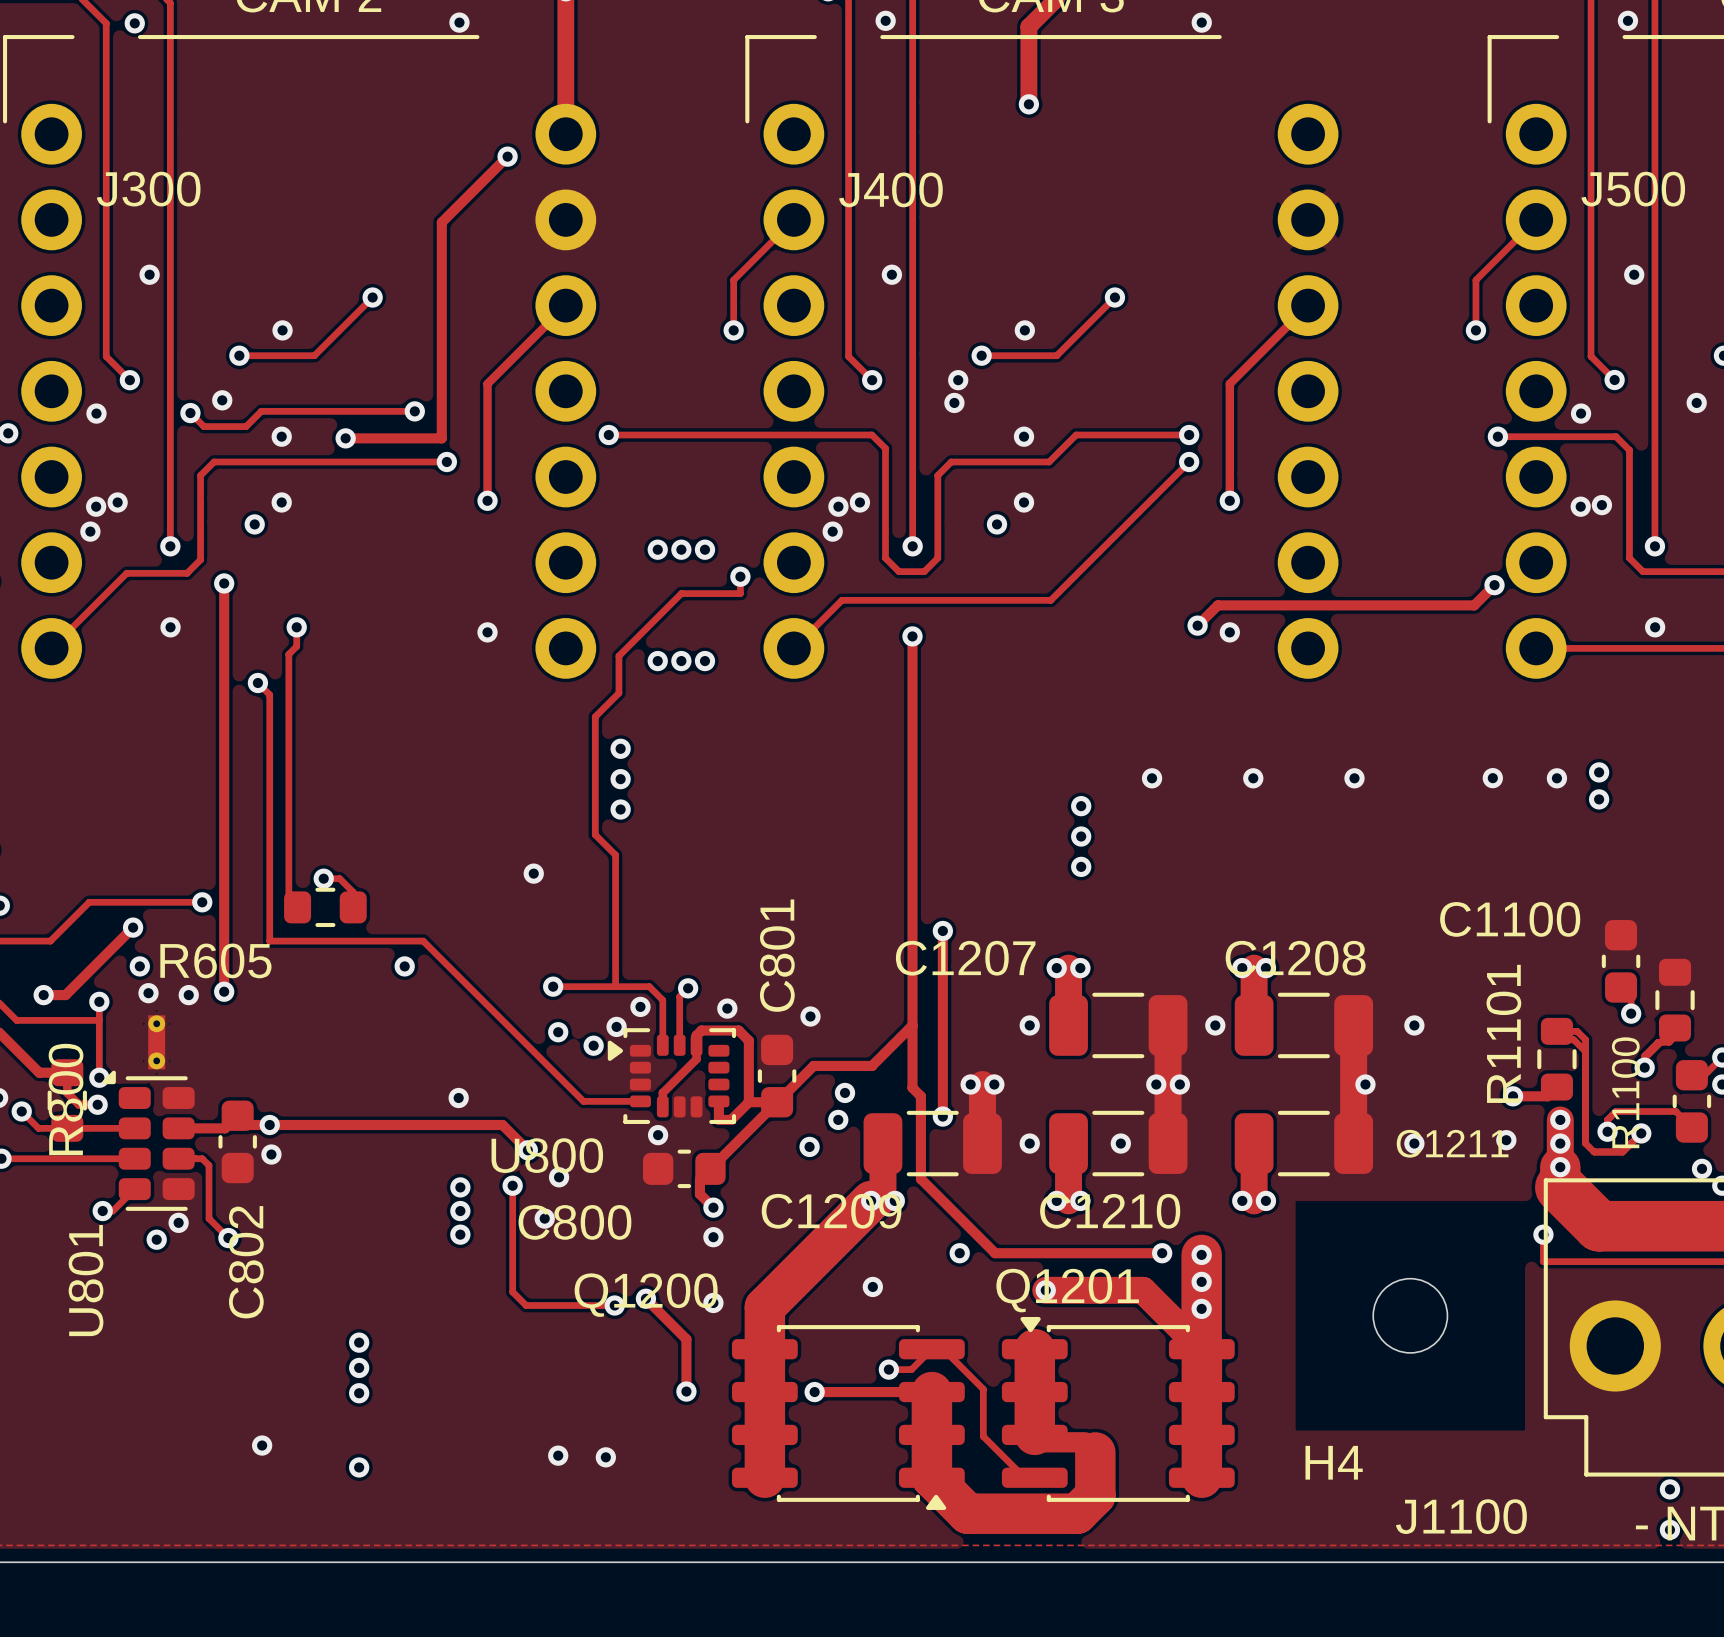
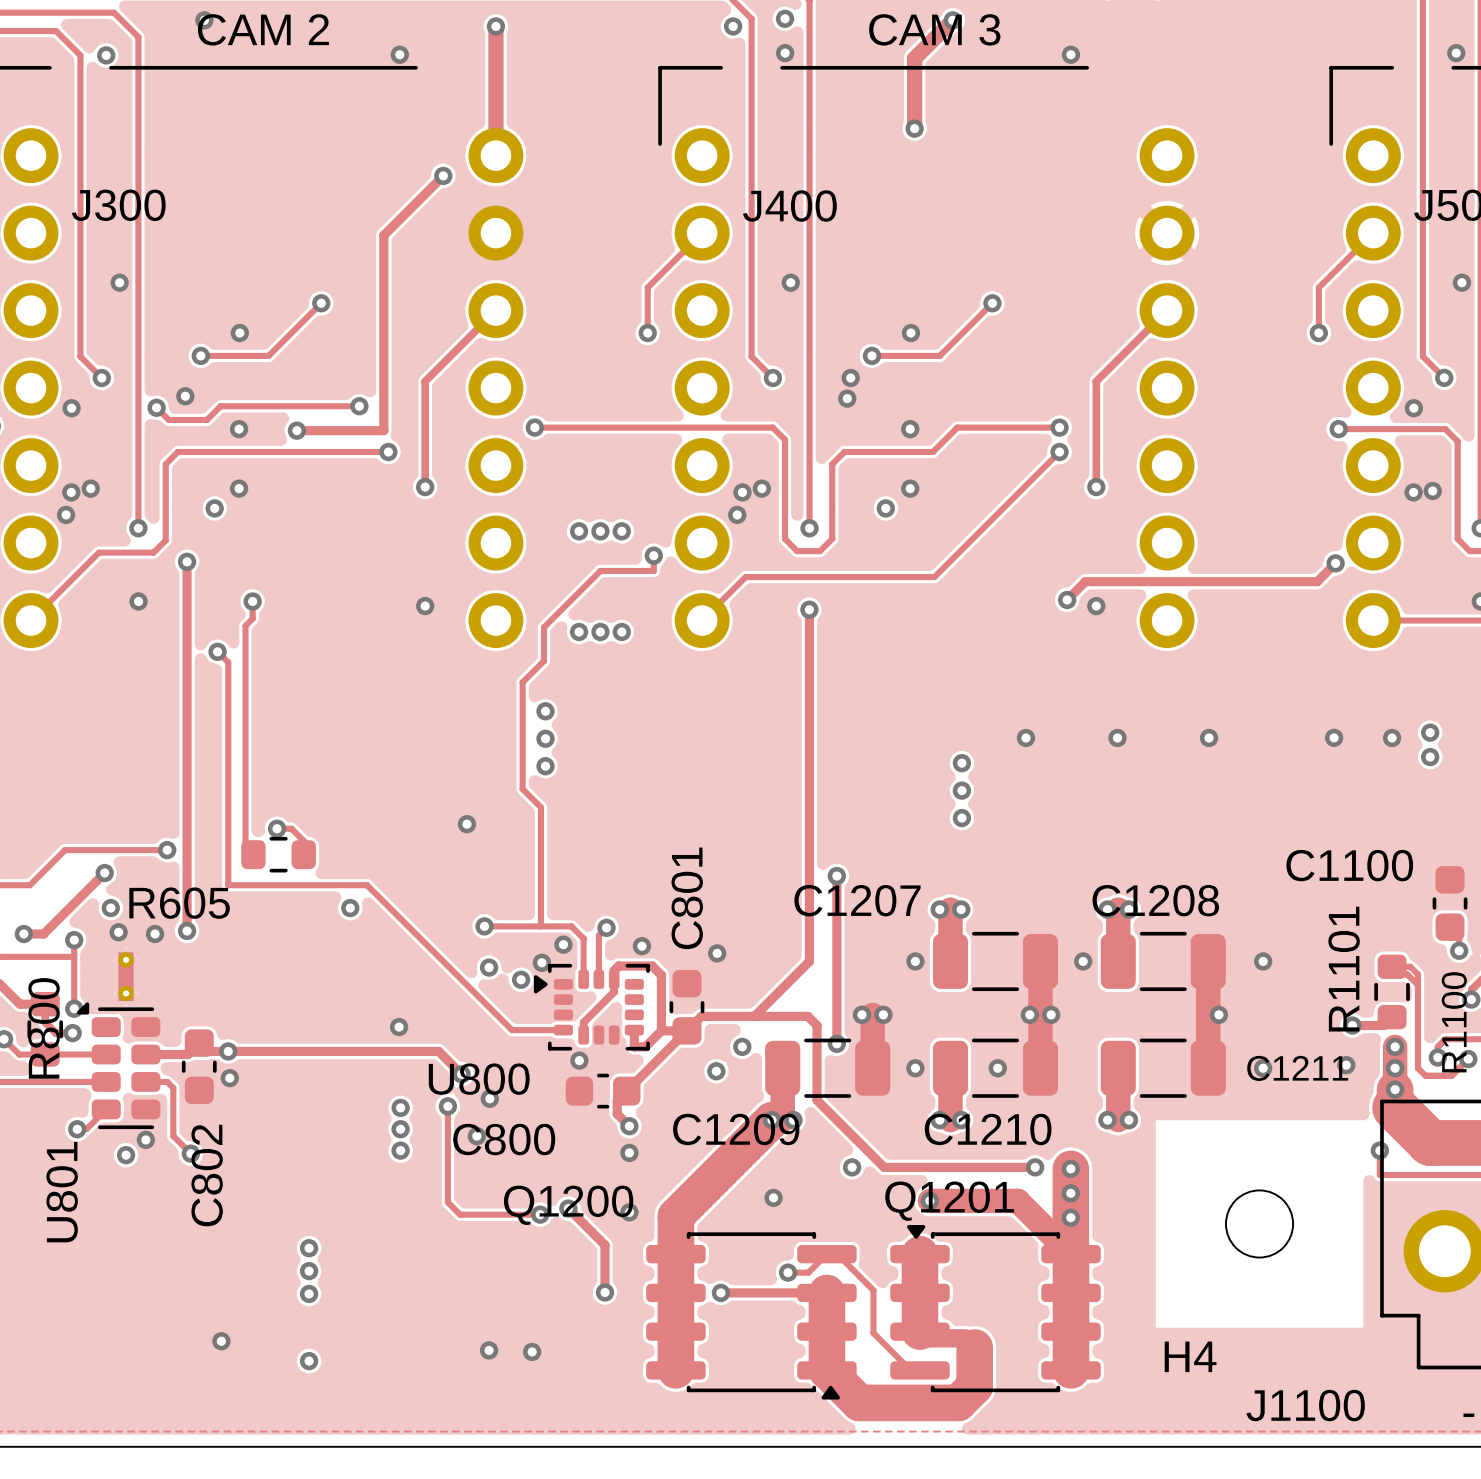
track: (912, 1025) (912, 1087) -> none
track: (872, 1065) (813, 1065) (793, 1086) -> (809, 1017) (807, 1016) (701, 1016)
track: none -> (772, 998) (754, 1016)
via: (845, 1092) -> none

